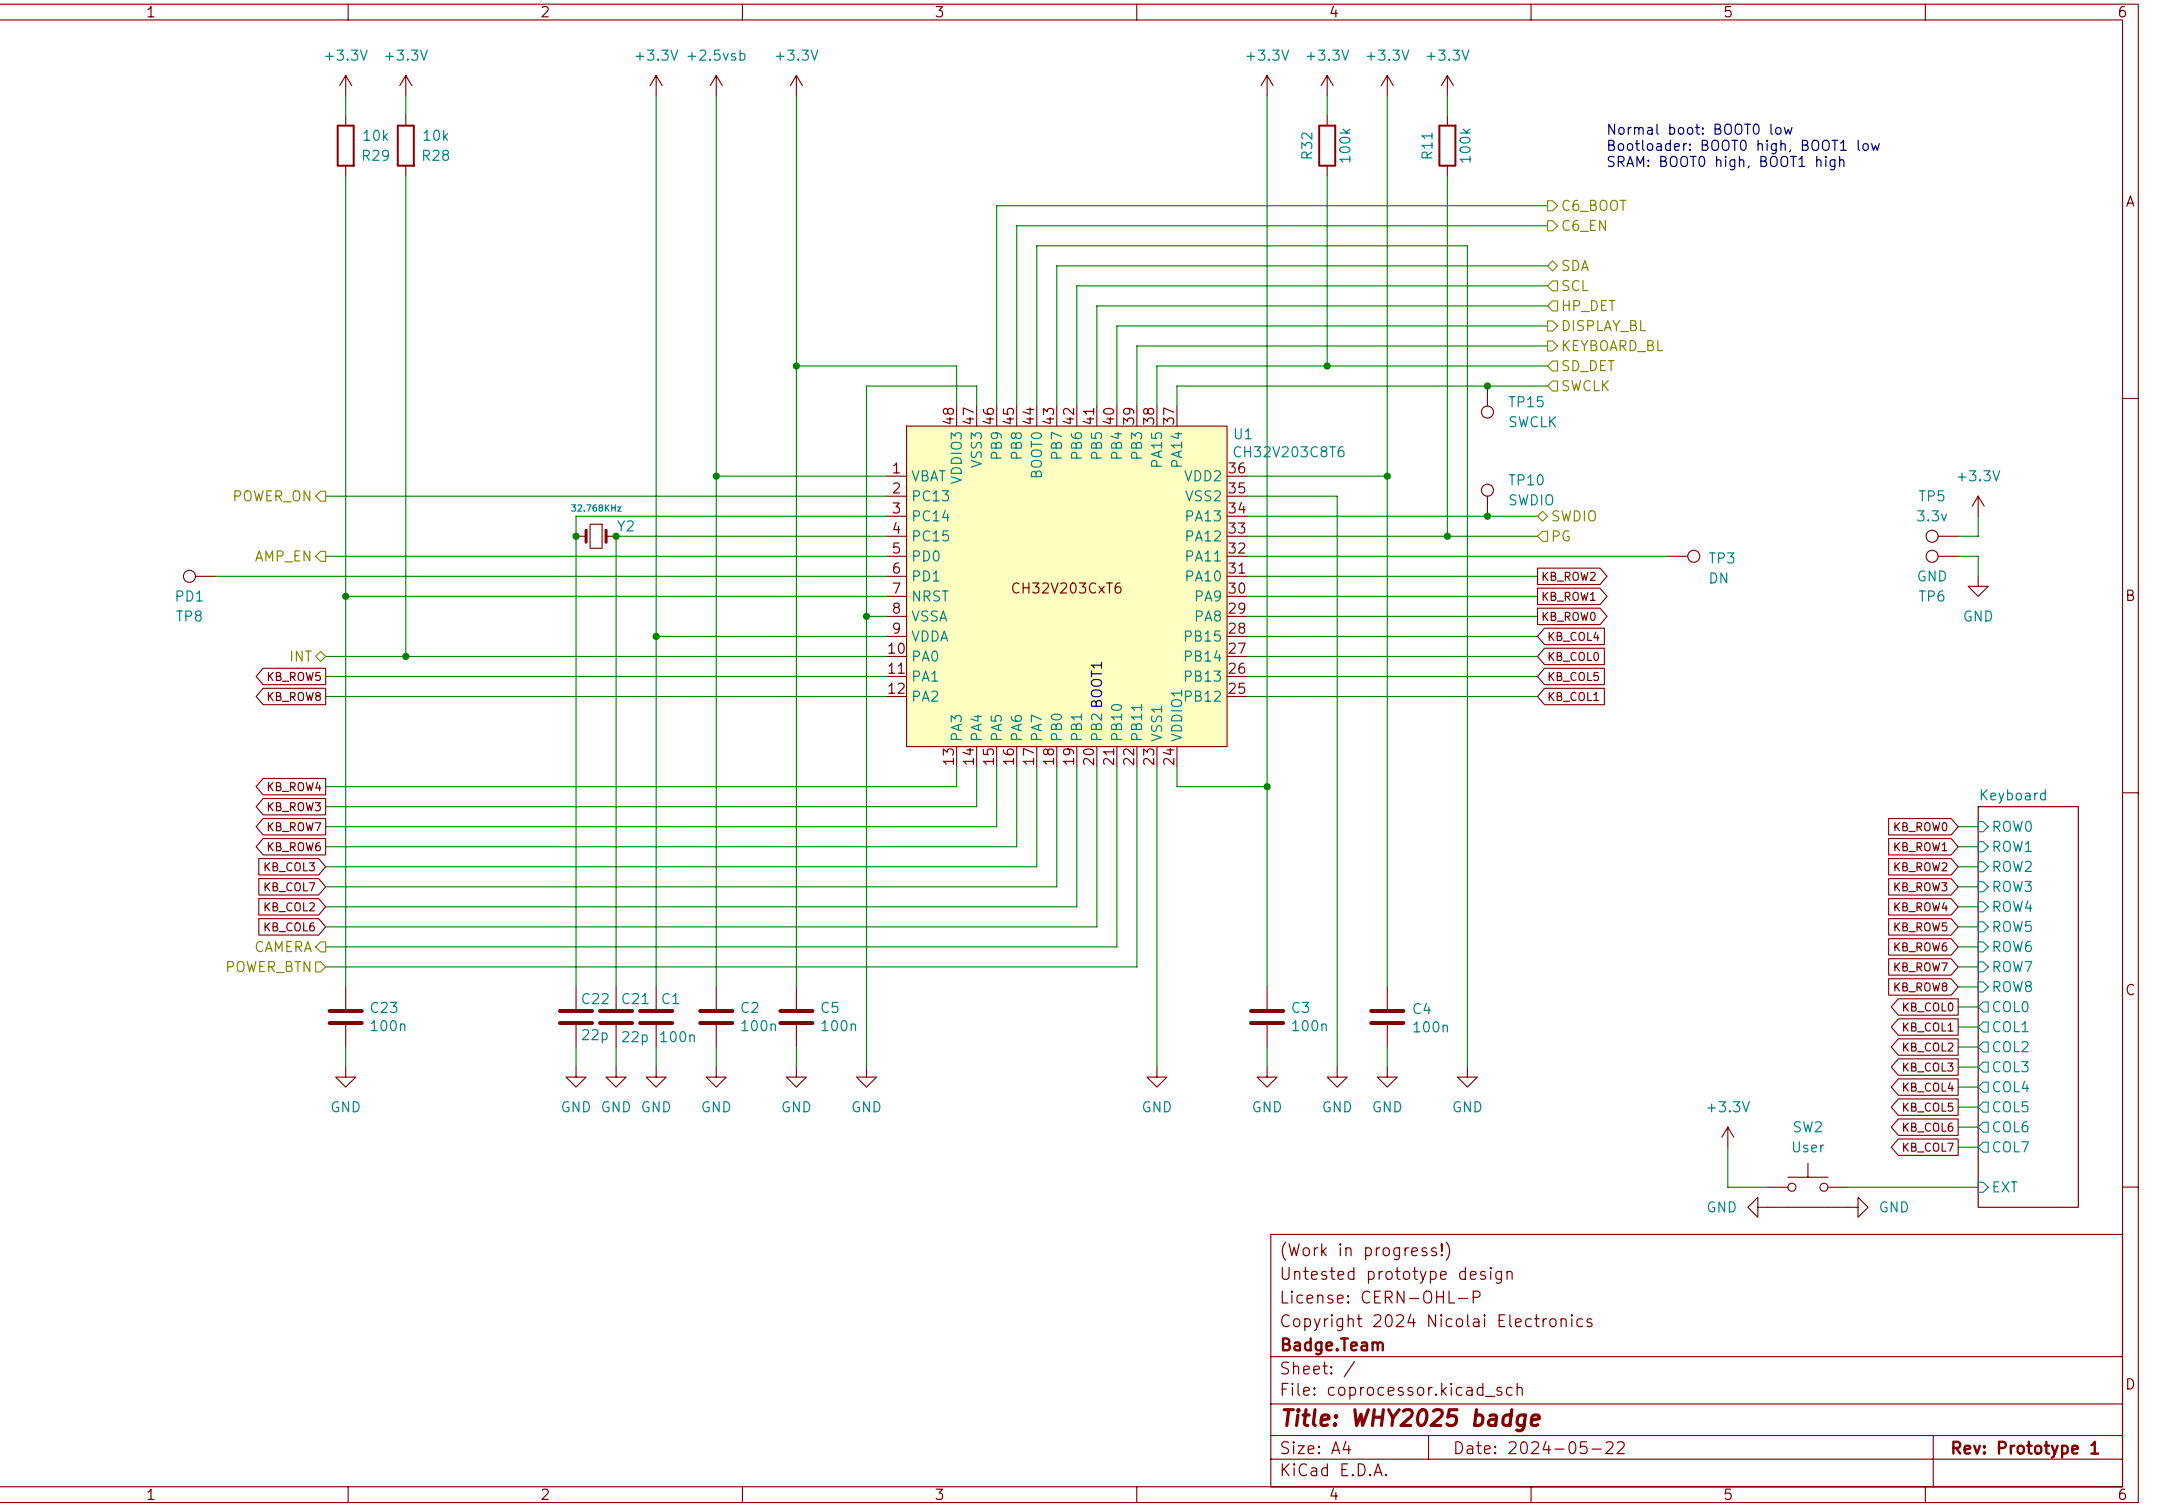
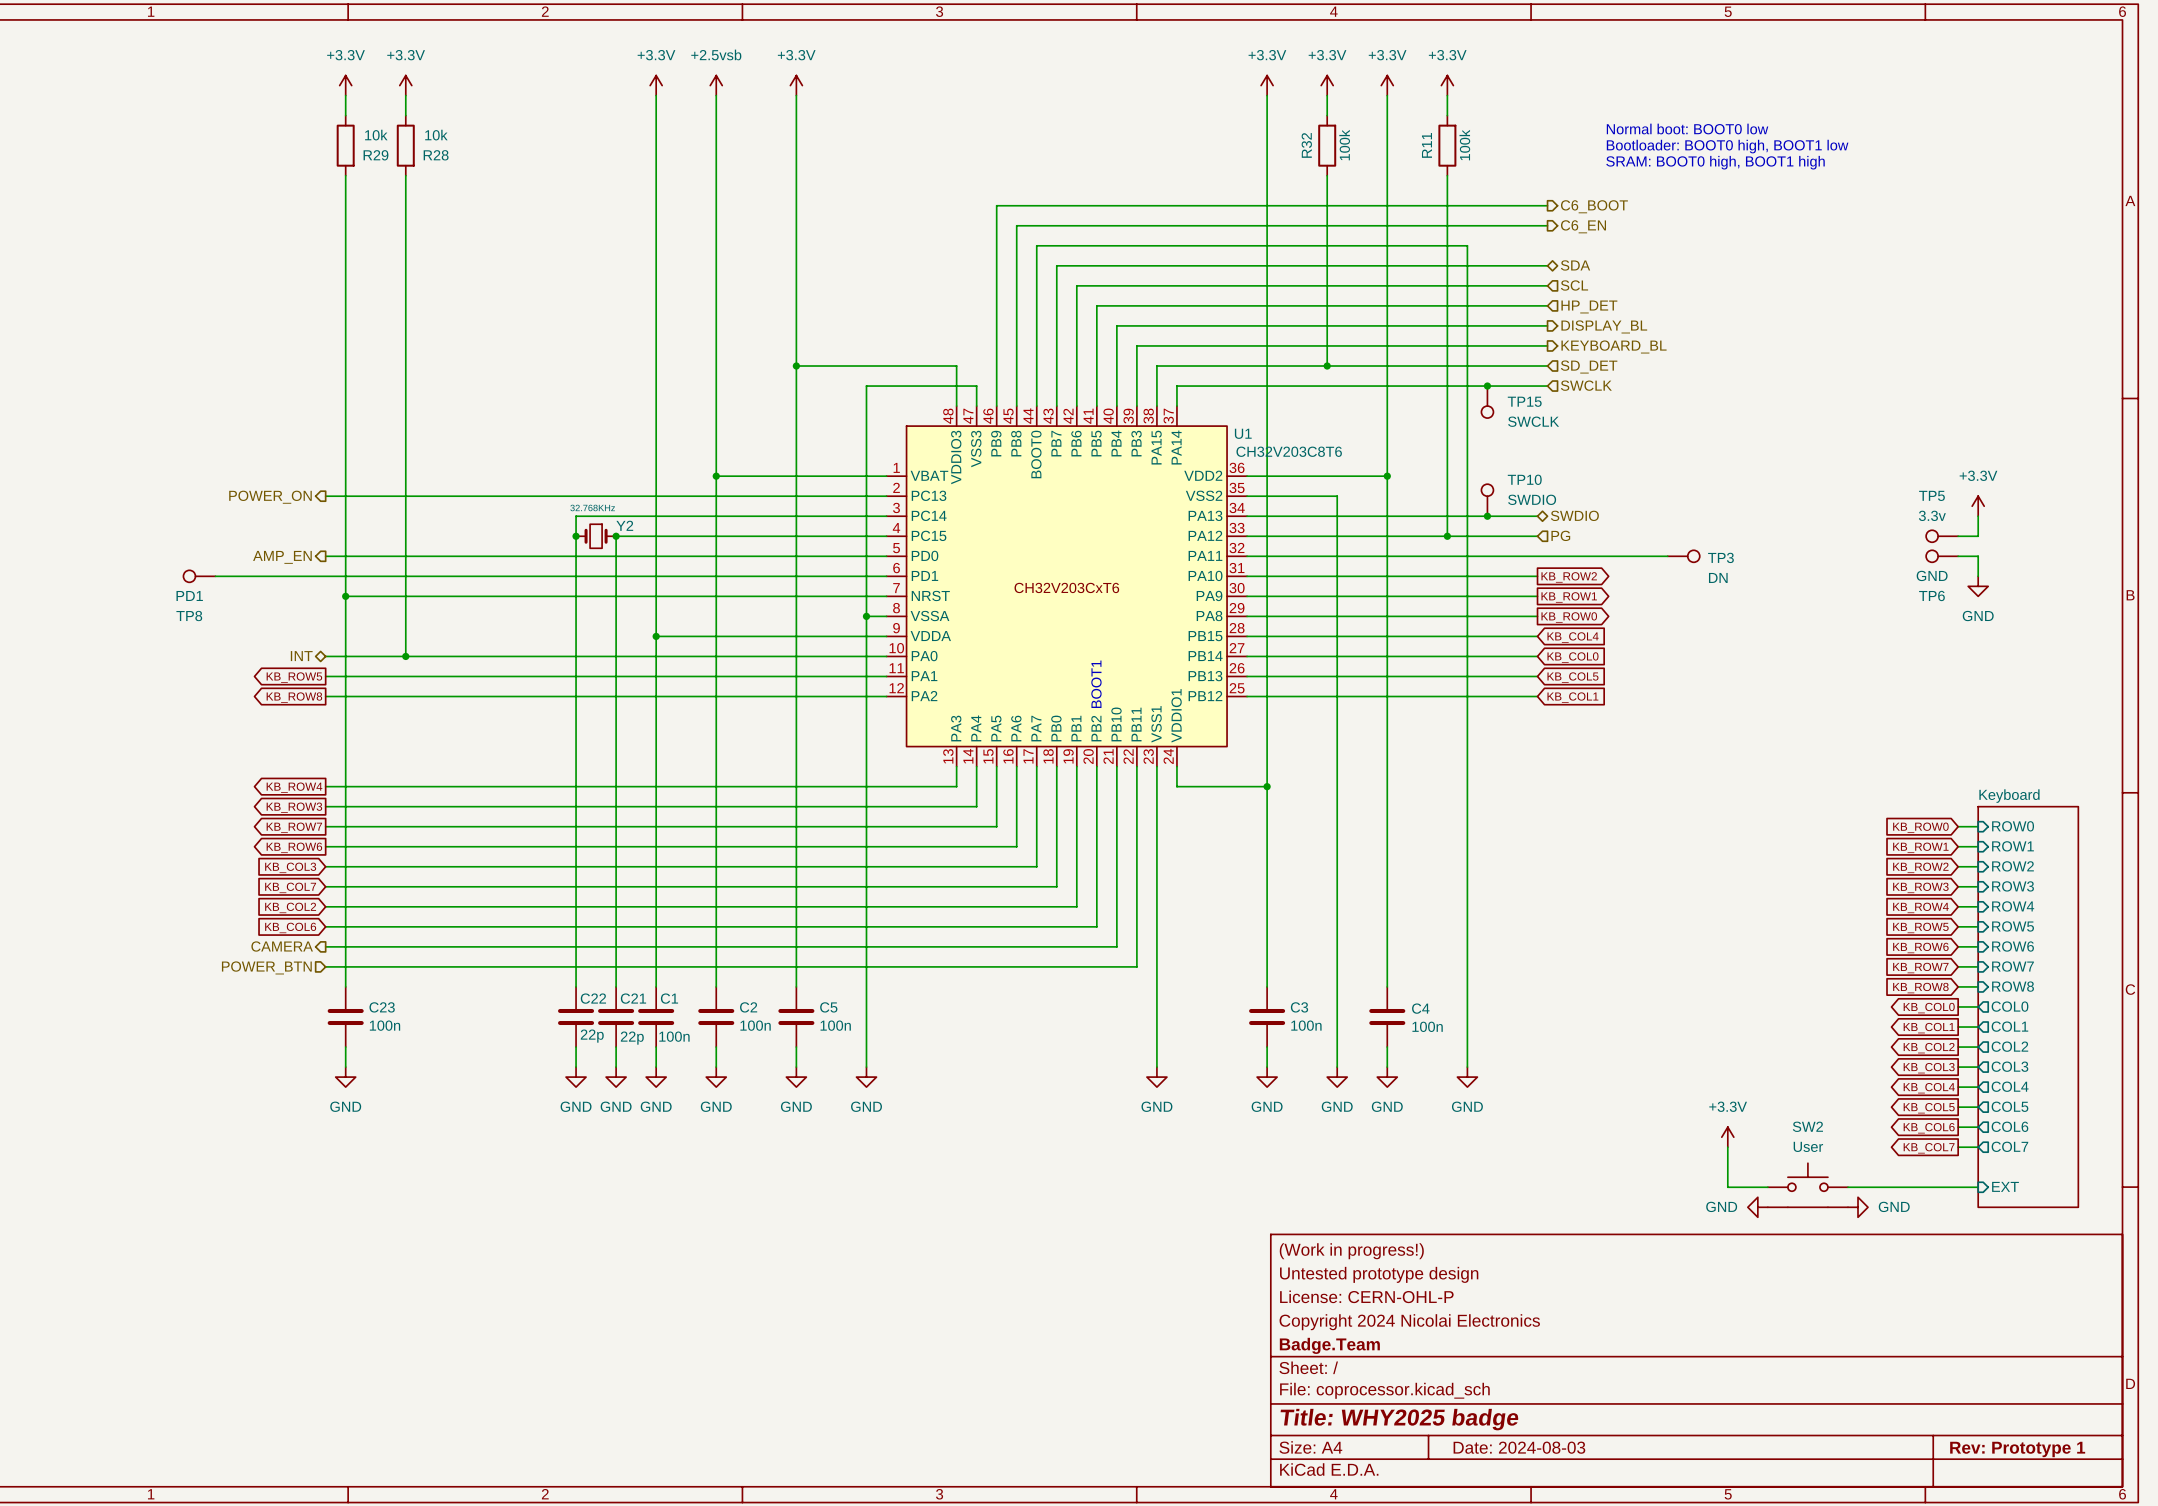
title block: Date: 2024-05-22 (1540, 1447) -> Date: 2024-08-03 (1519, 1447)

